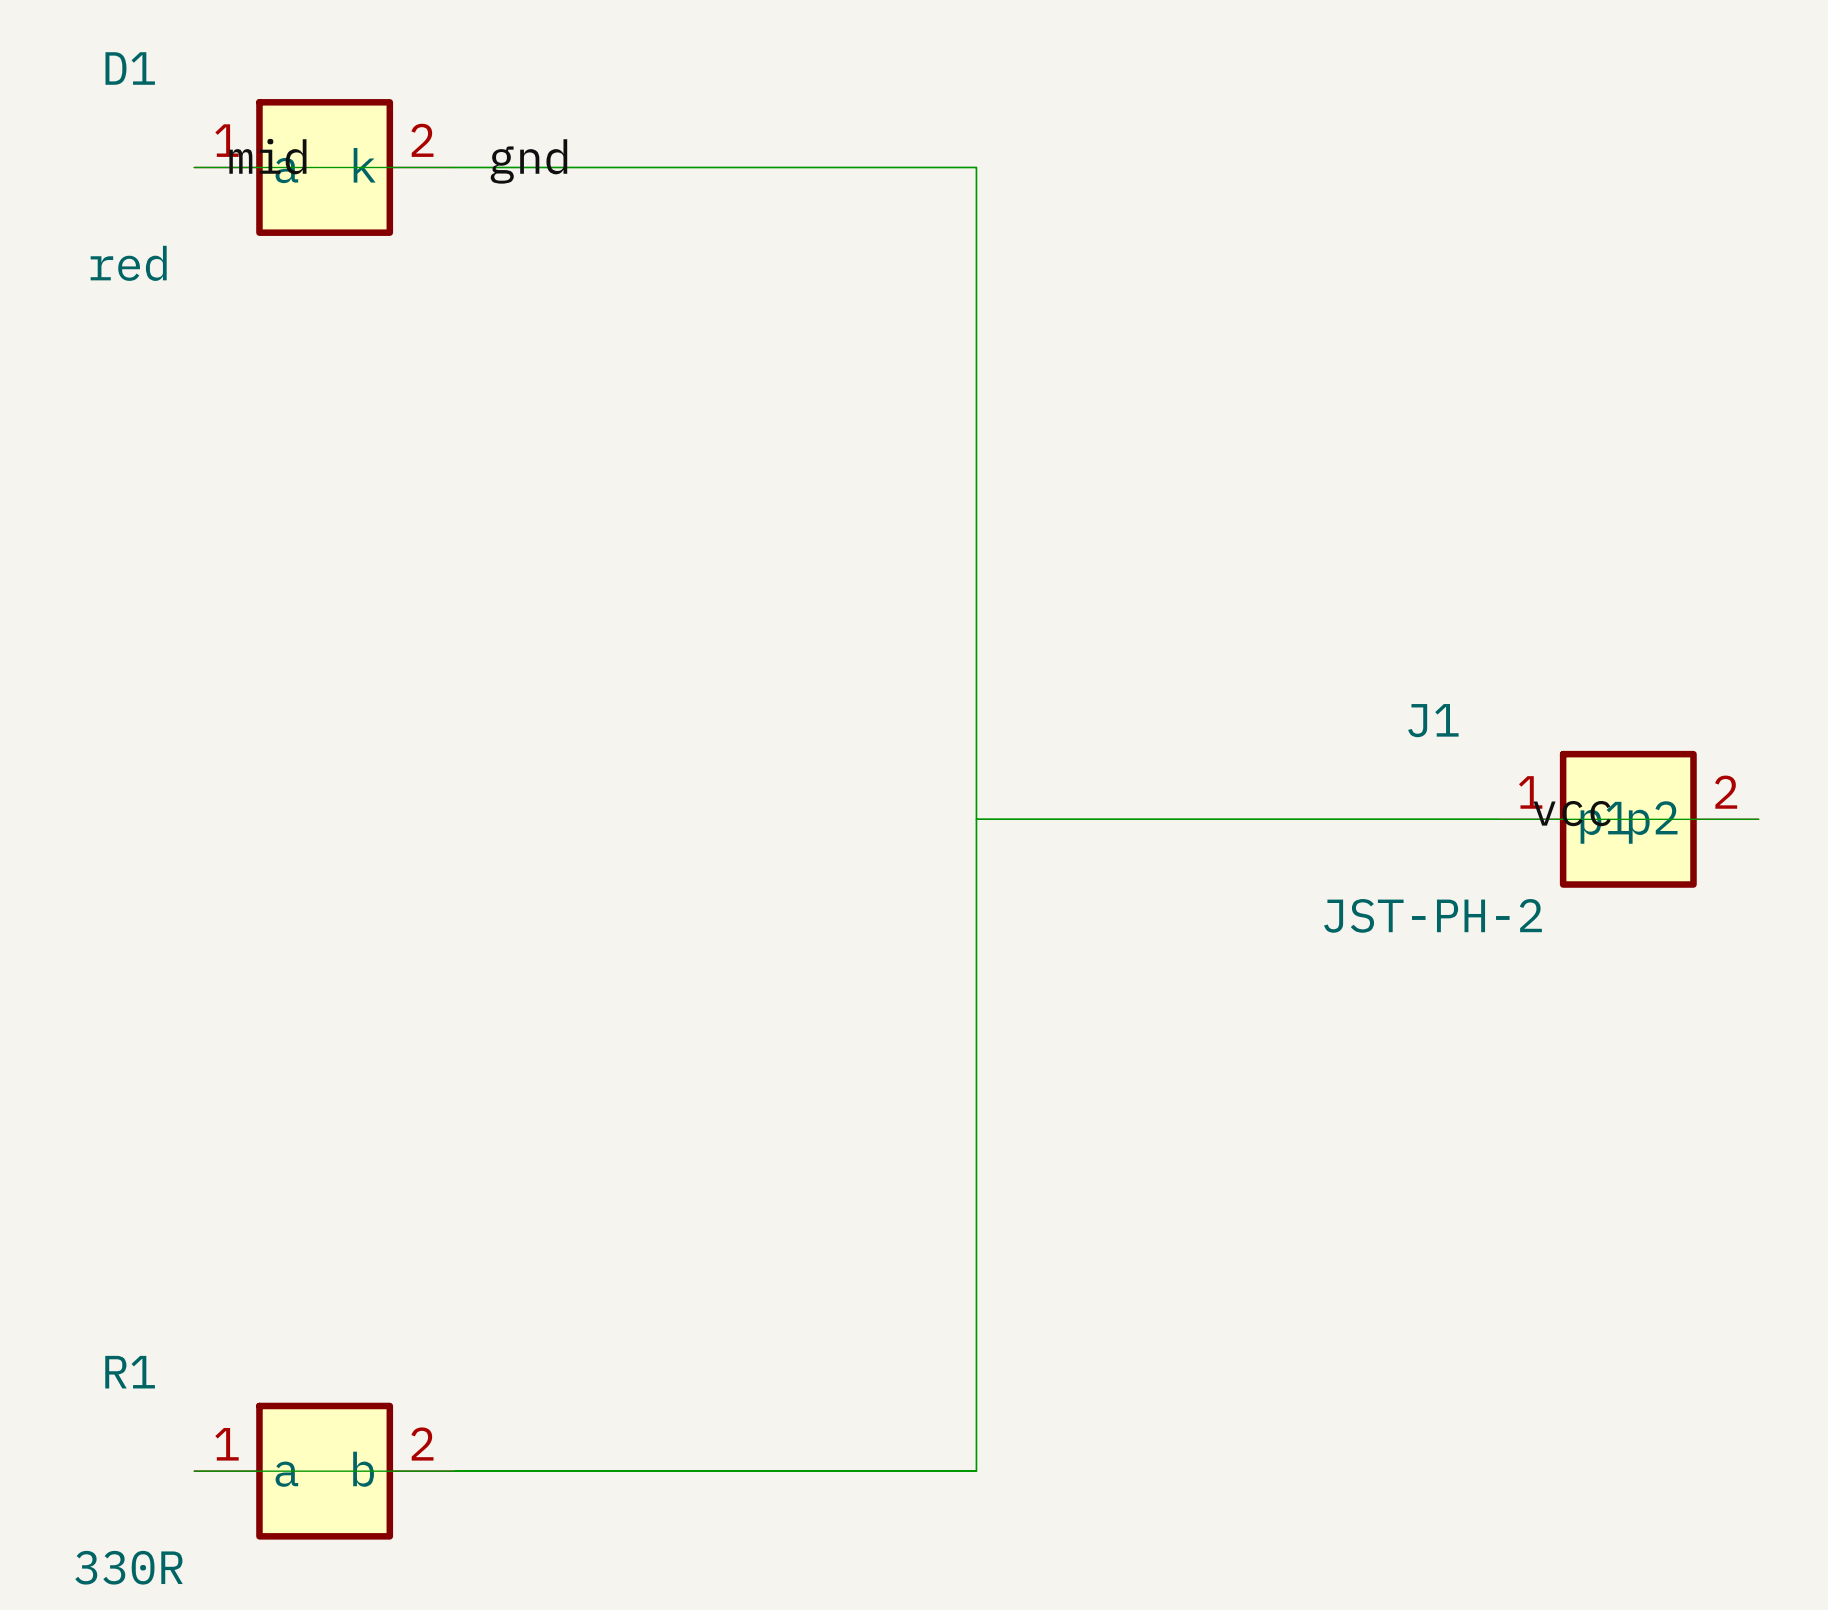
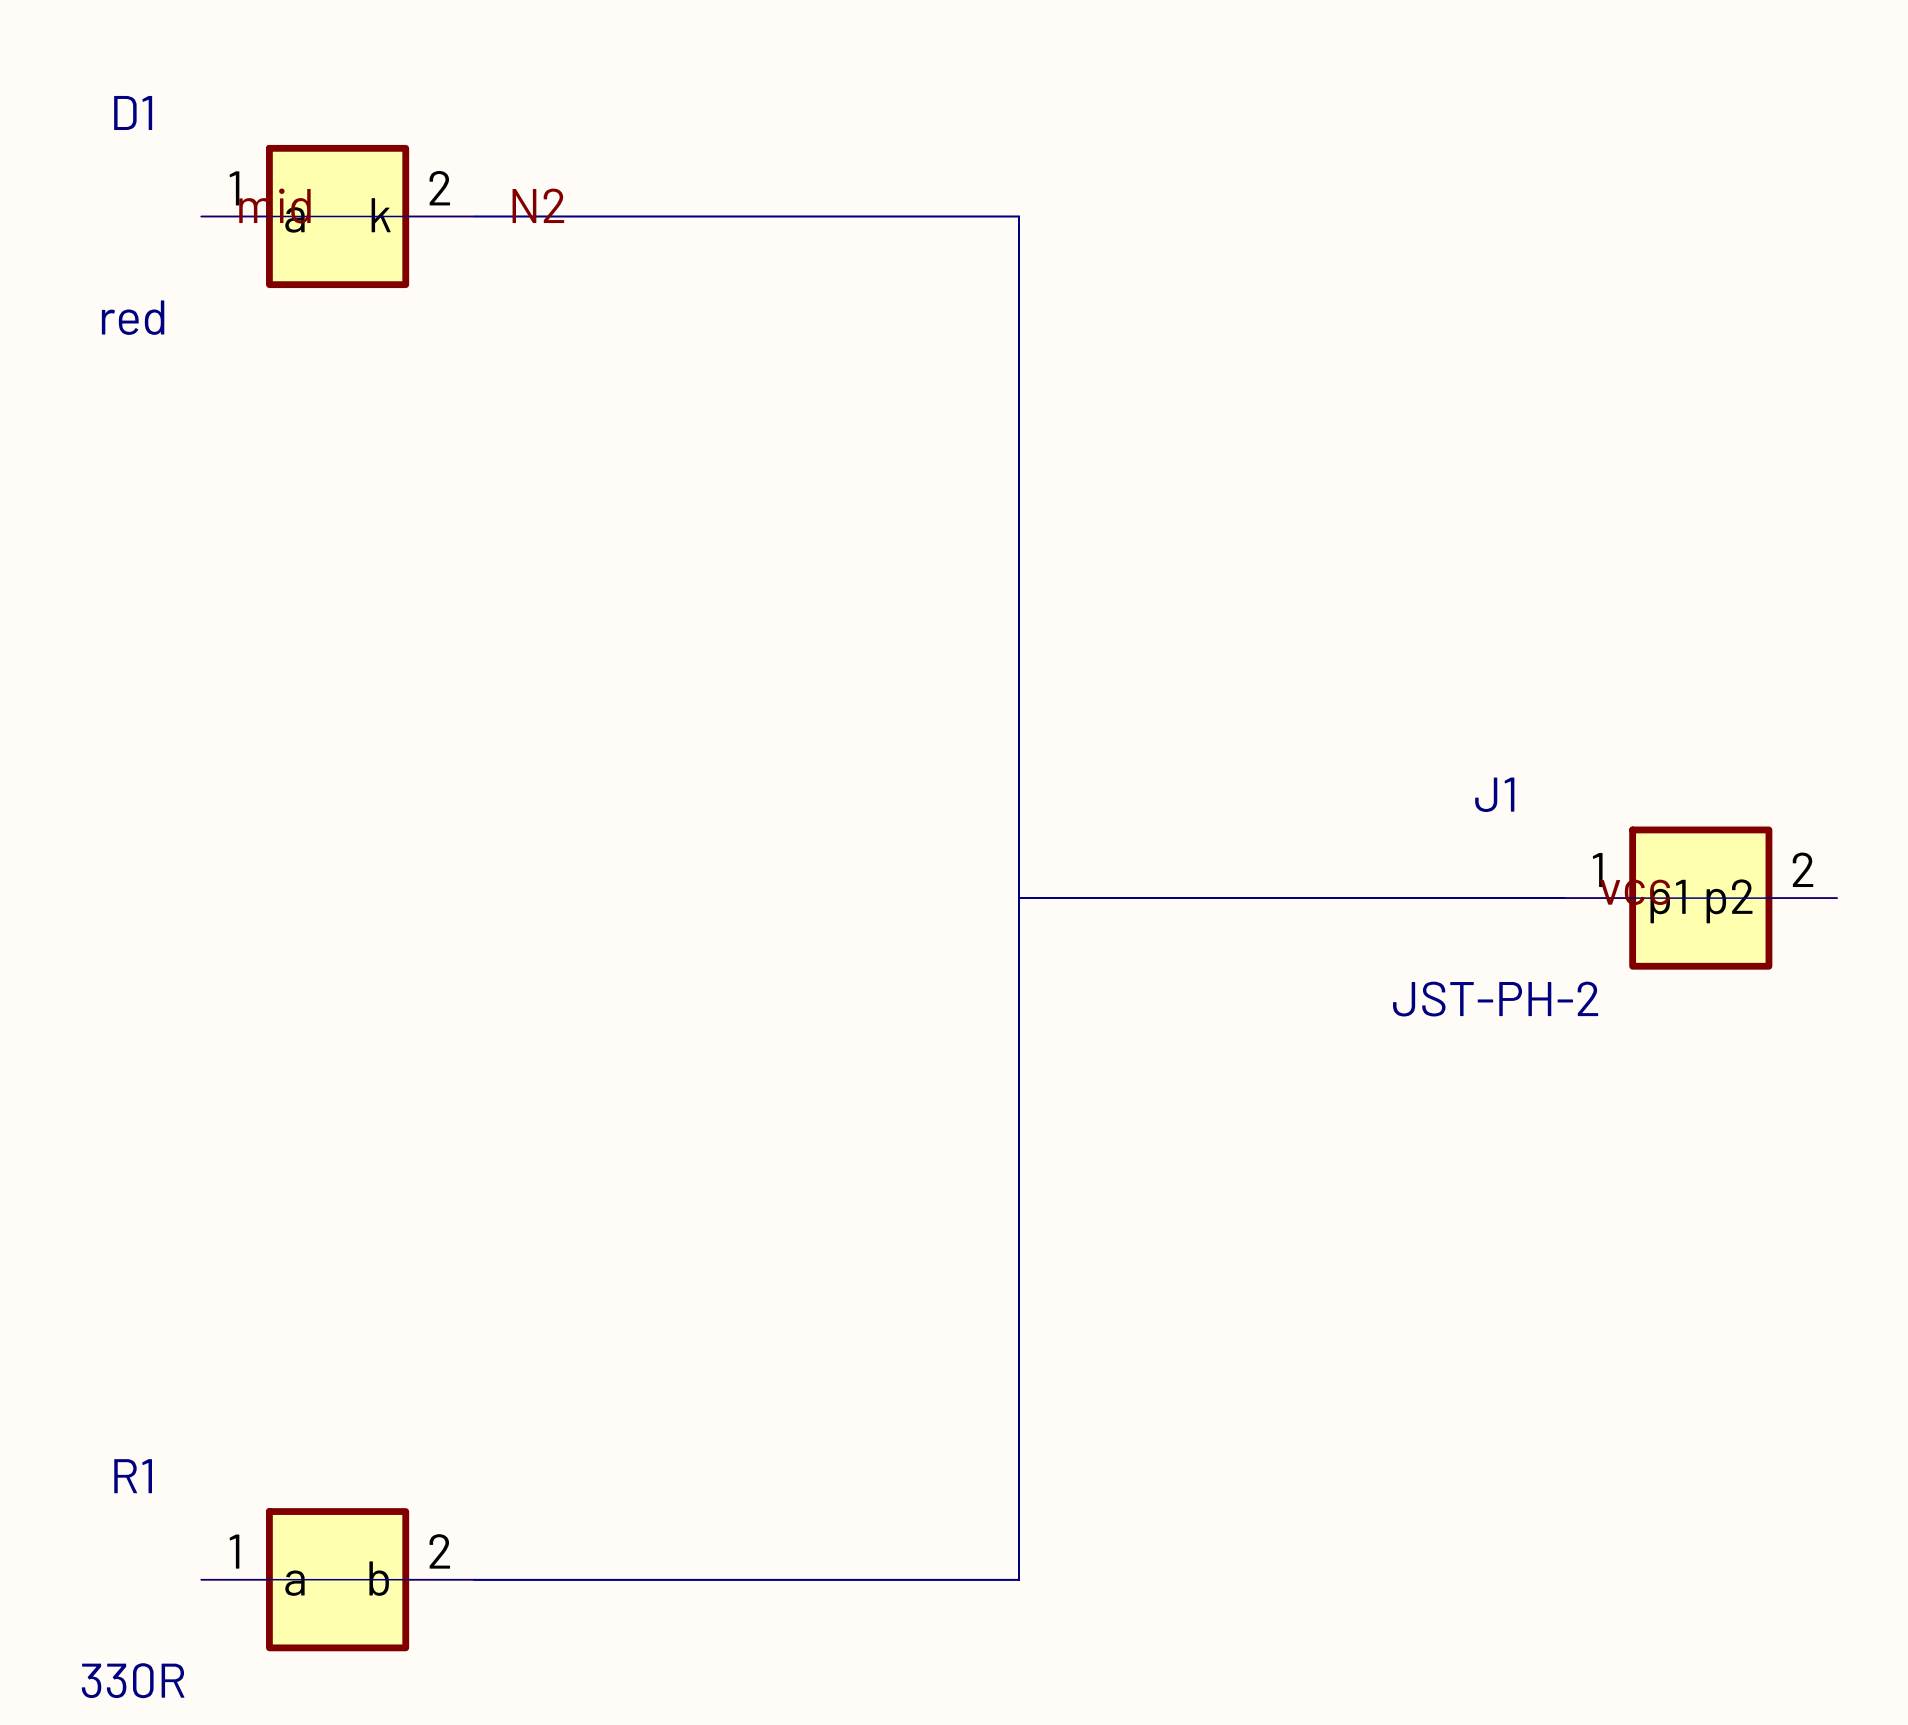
label: gnd (528, 161) -> N2 (538, 205)

